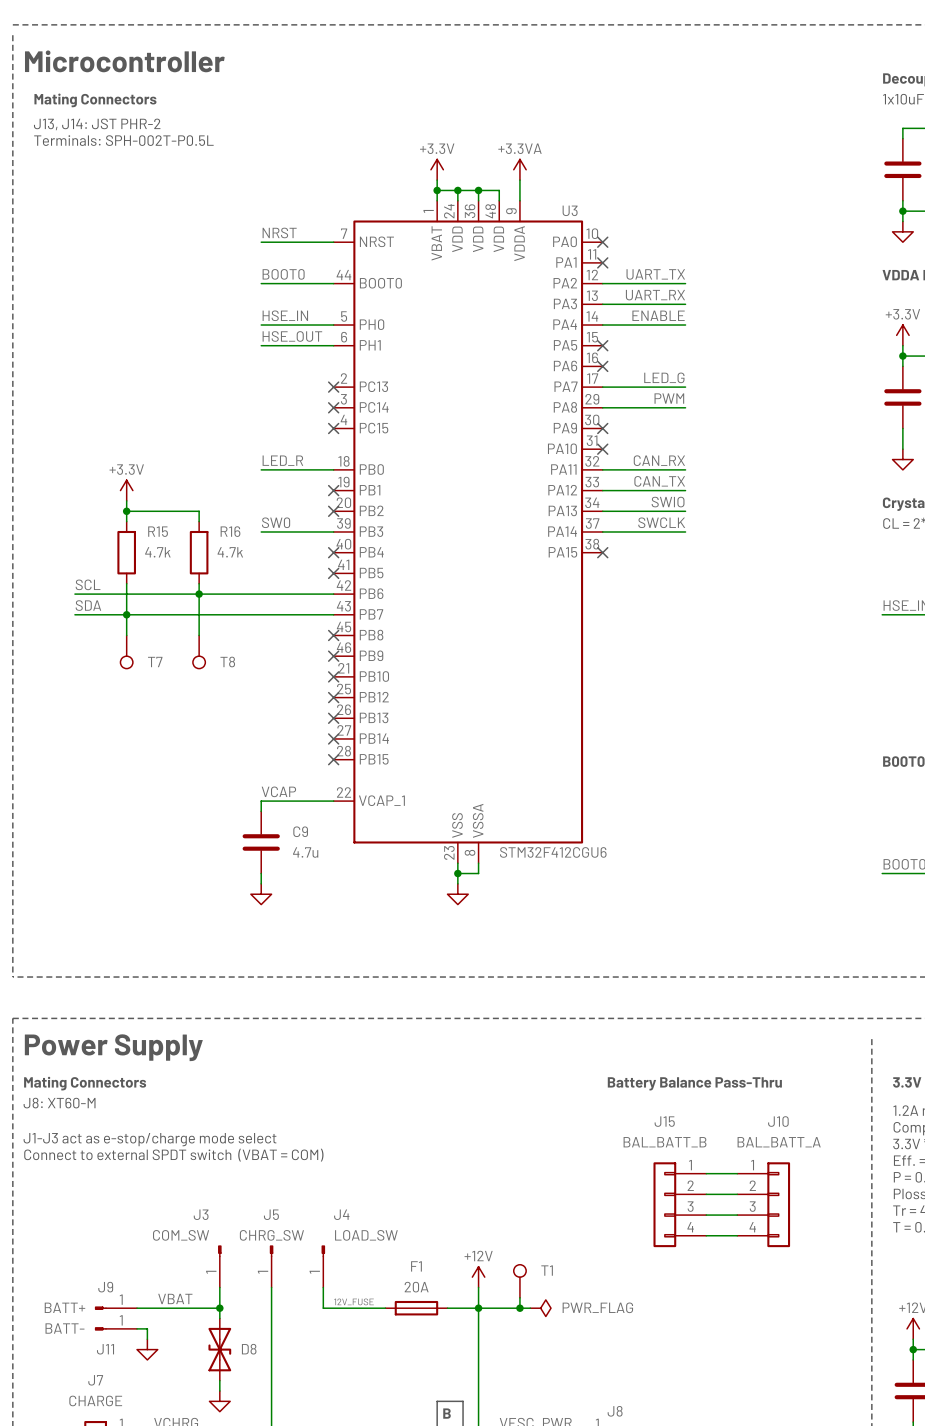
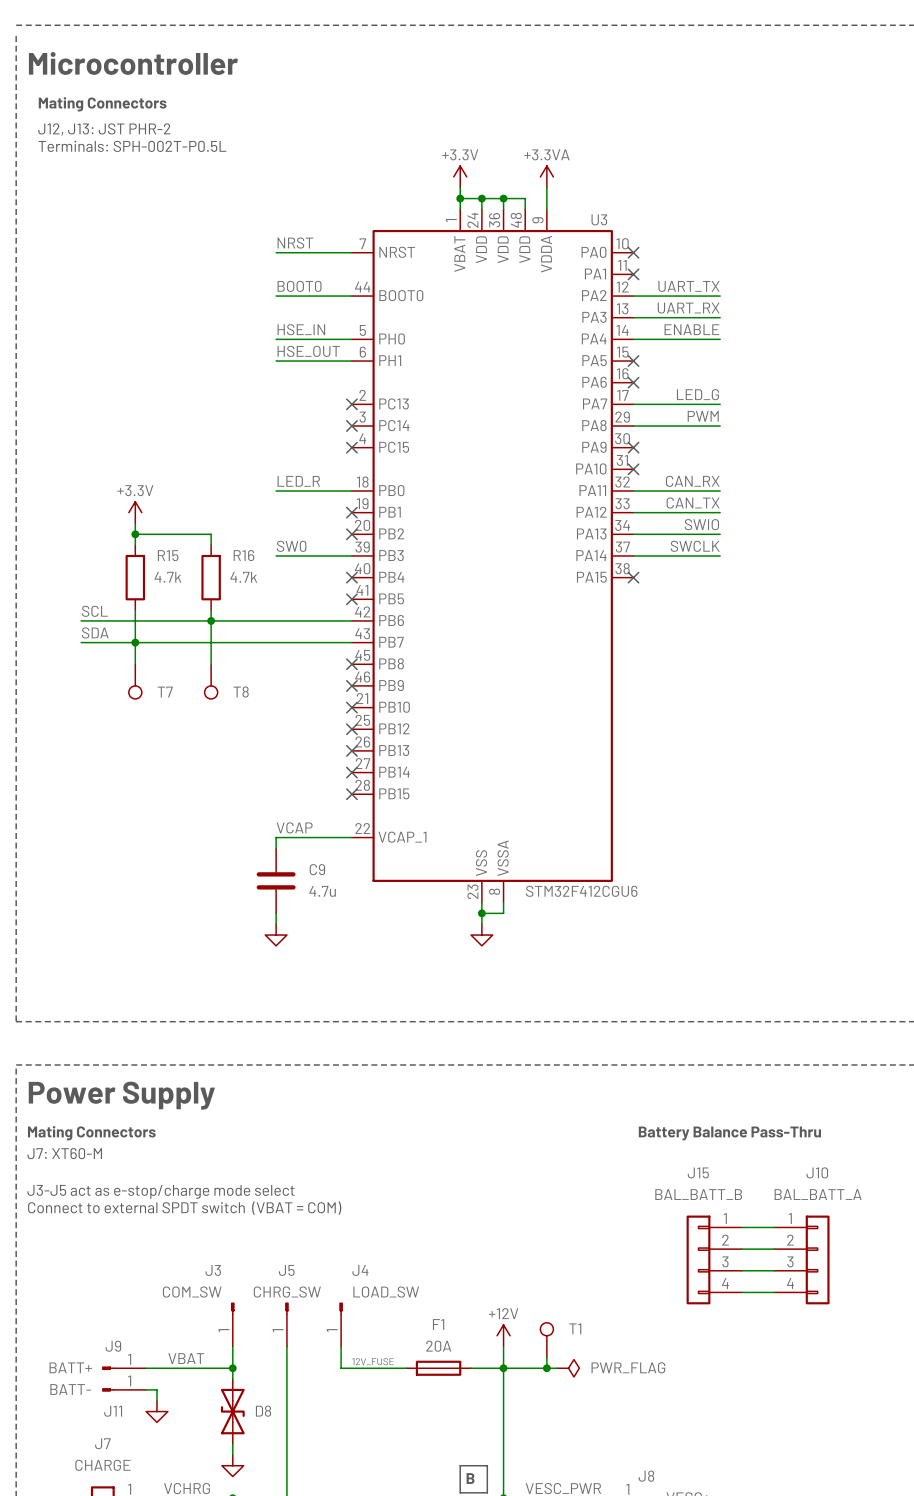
text: J13, J14: JST PHR-2 (97, 124) -> J12, J13: JST PHR-2 (104, 129)
text: J8: XT60-M (59, 1103) -> J7: XT60-M (64, 1153)
text: J1-J3 act as e-stop/charge mode select (150, 1139) -> J3-J5 act as e-stop/charge mode select (160, 1191)

